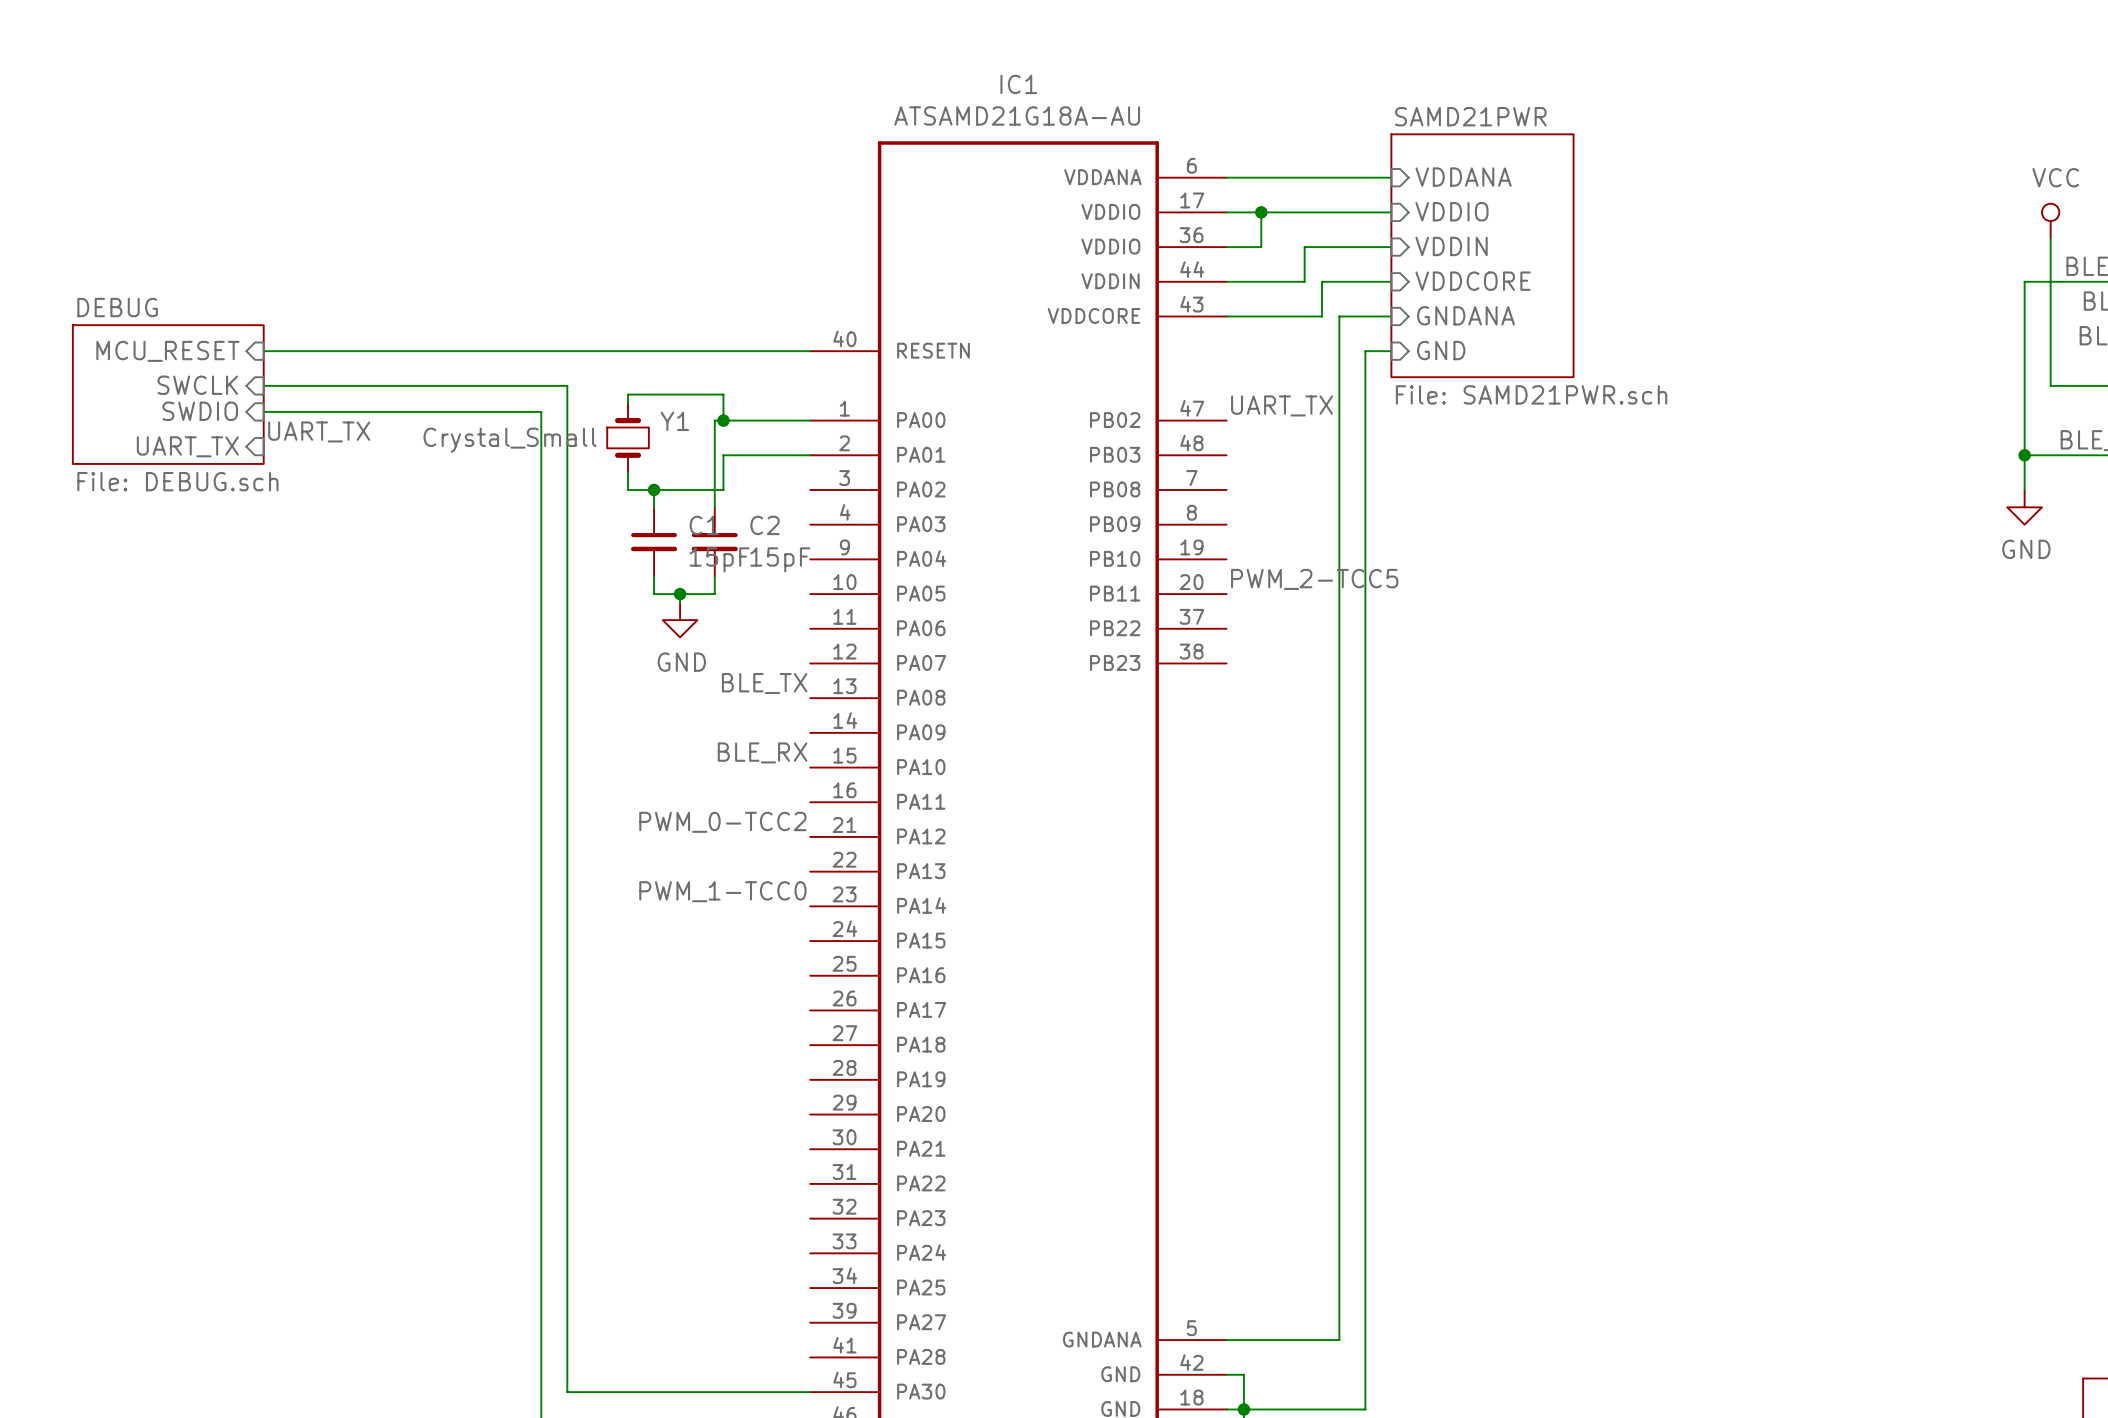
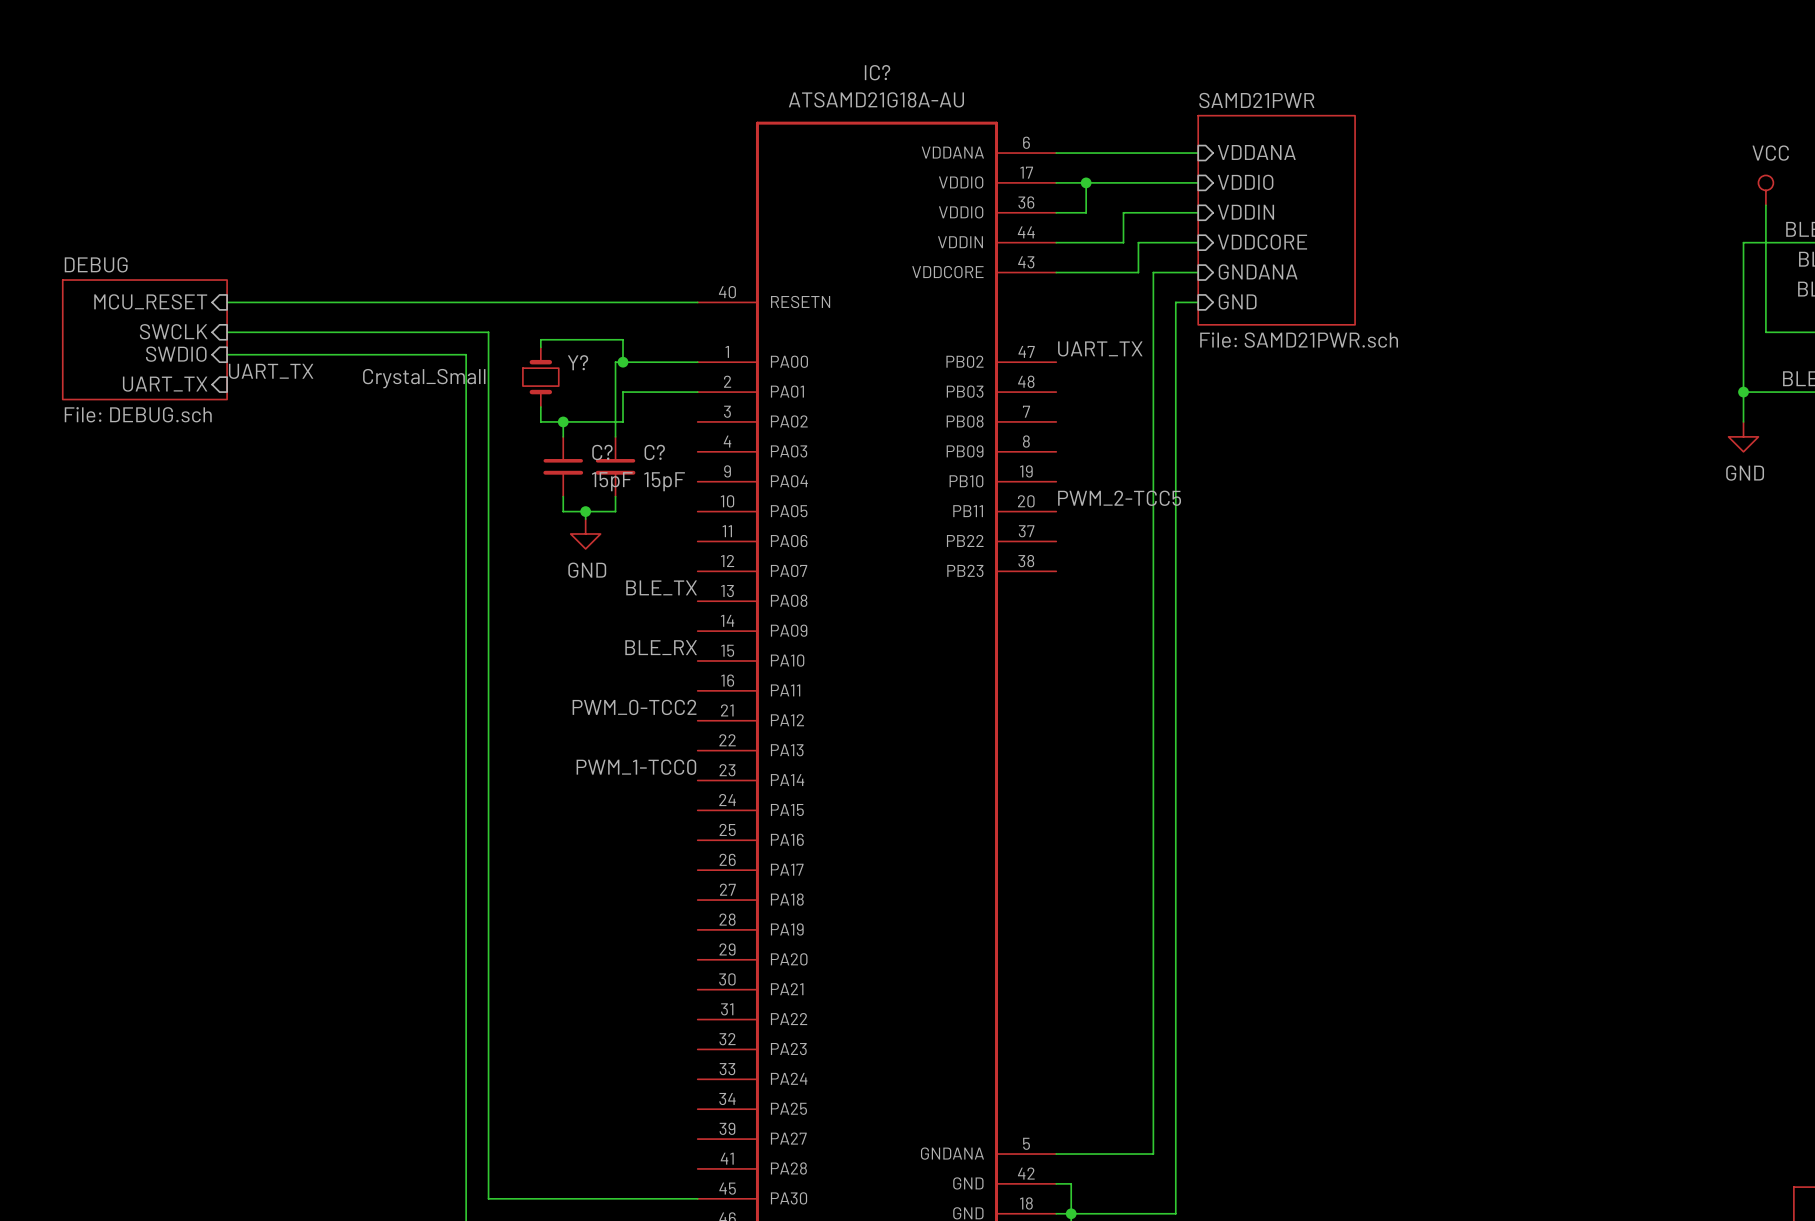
IC1 name: IC1 (1018, 84) -> IC? (877, 72)
Y1 name: Y1 (674, 421) -> Y? (578, 362)
C1 name: C1 (704, 525) -> C? (602, 452)
C2 name: C2 (765, 525) -> C? (654, 452)

